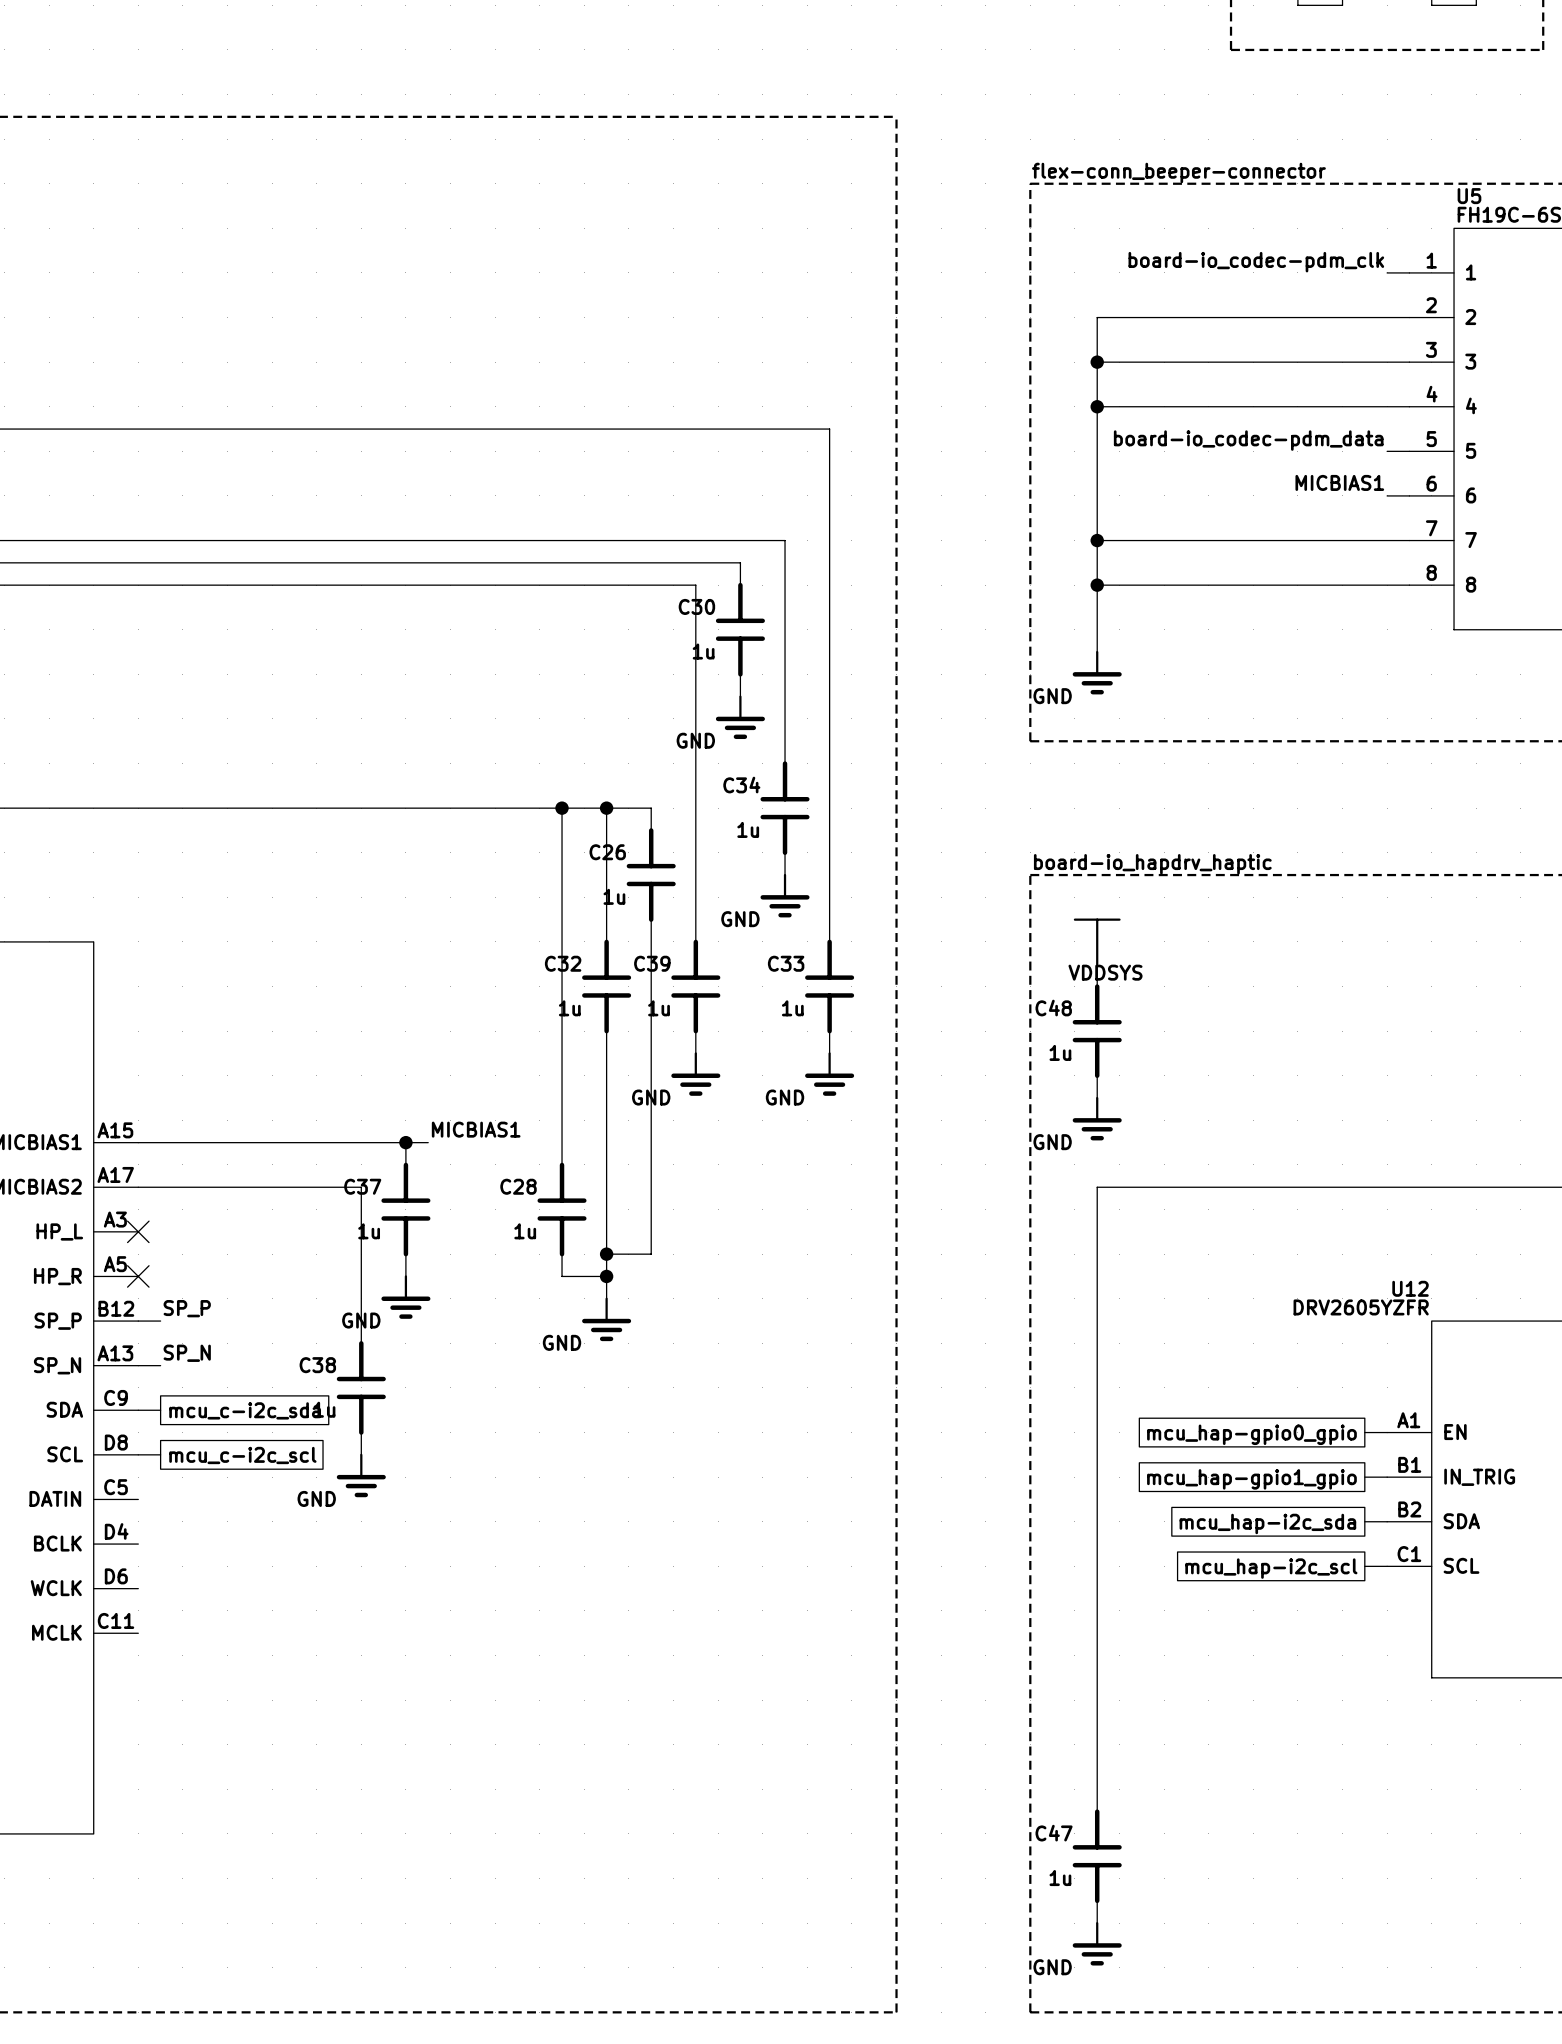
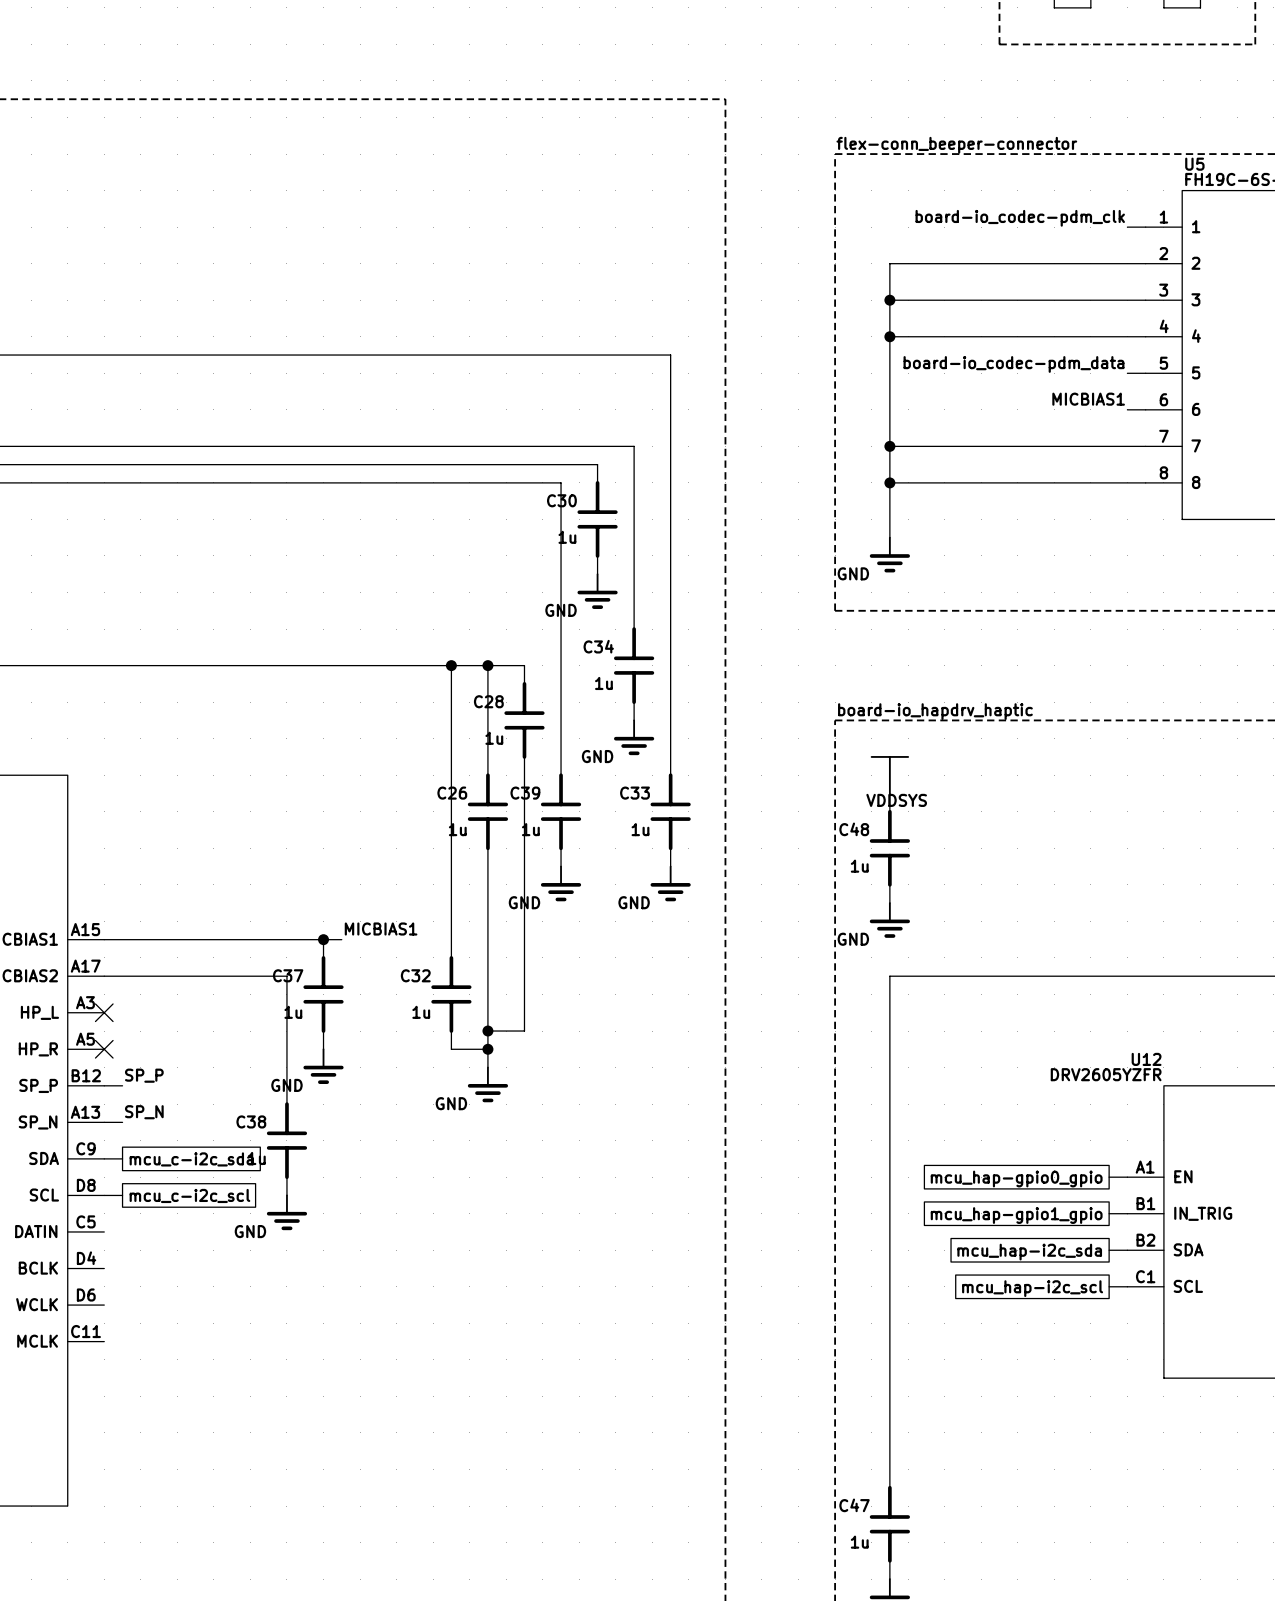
C26 name: C26 (607, 852) -> C28 (488, 701)
C32 name: C32 (563, 963) -> C26 (452, 793)
C28 name: C28 (518, 1186) -> C32 (415, 975)

